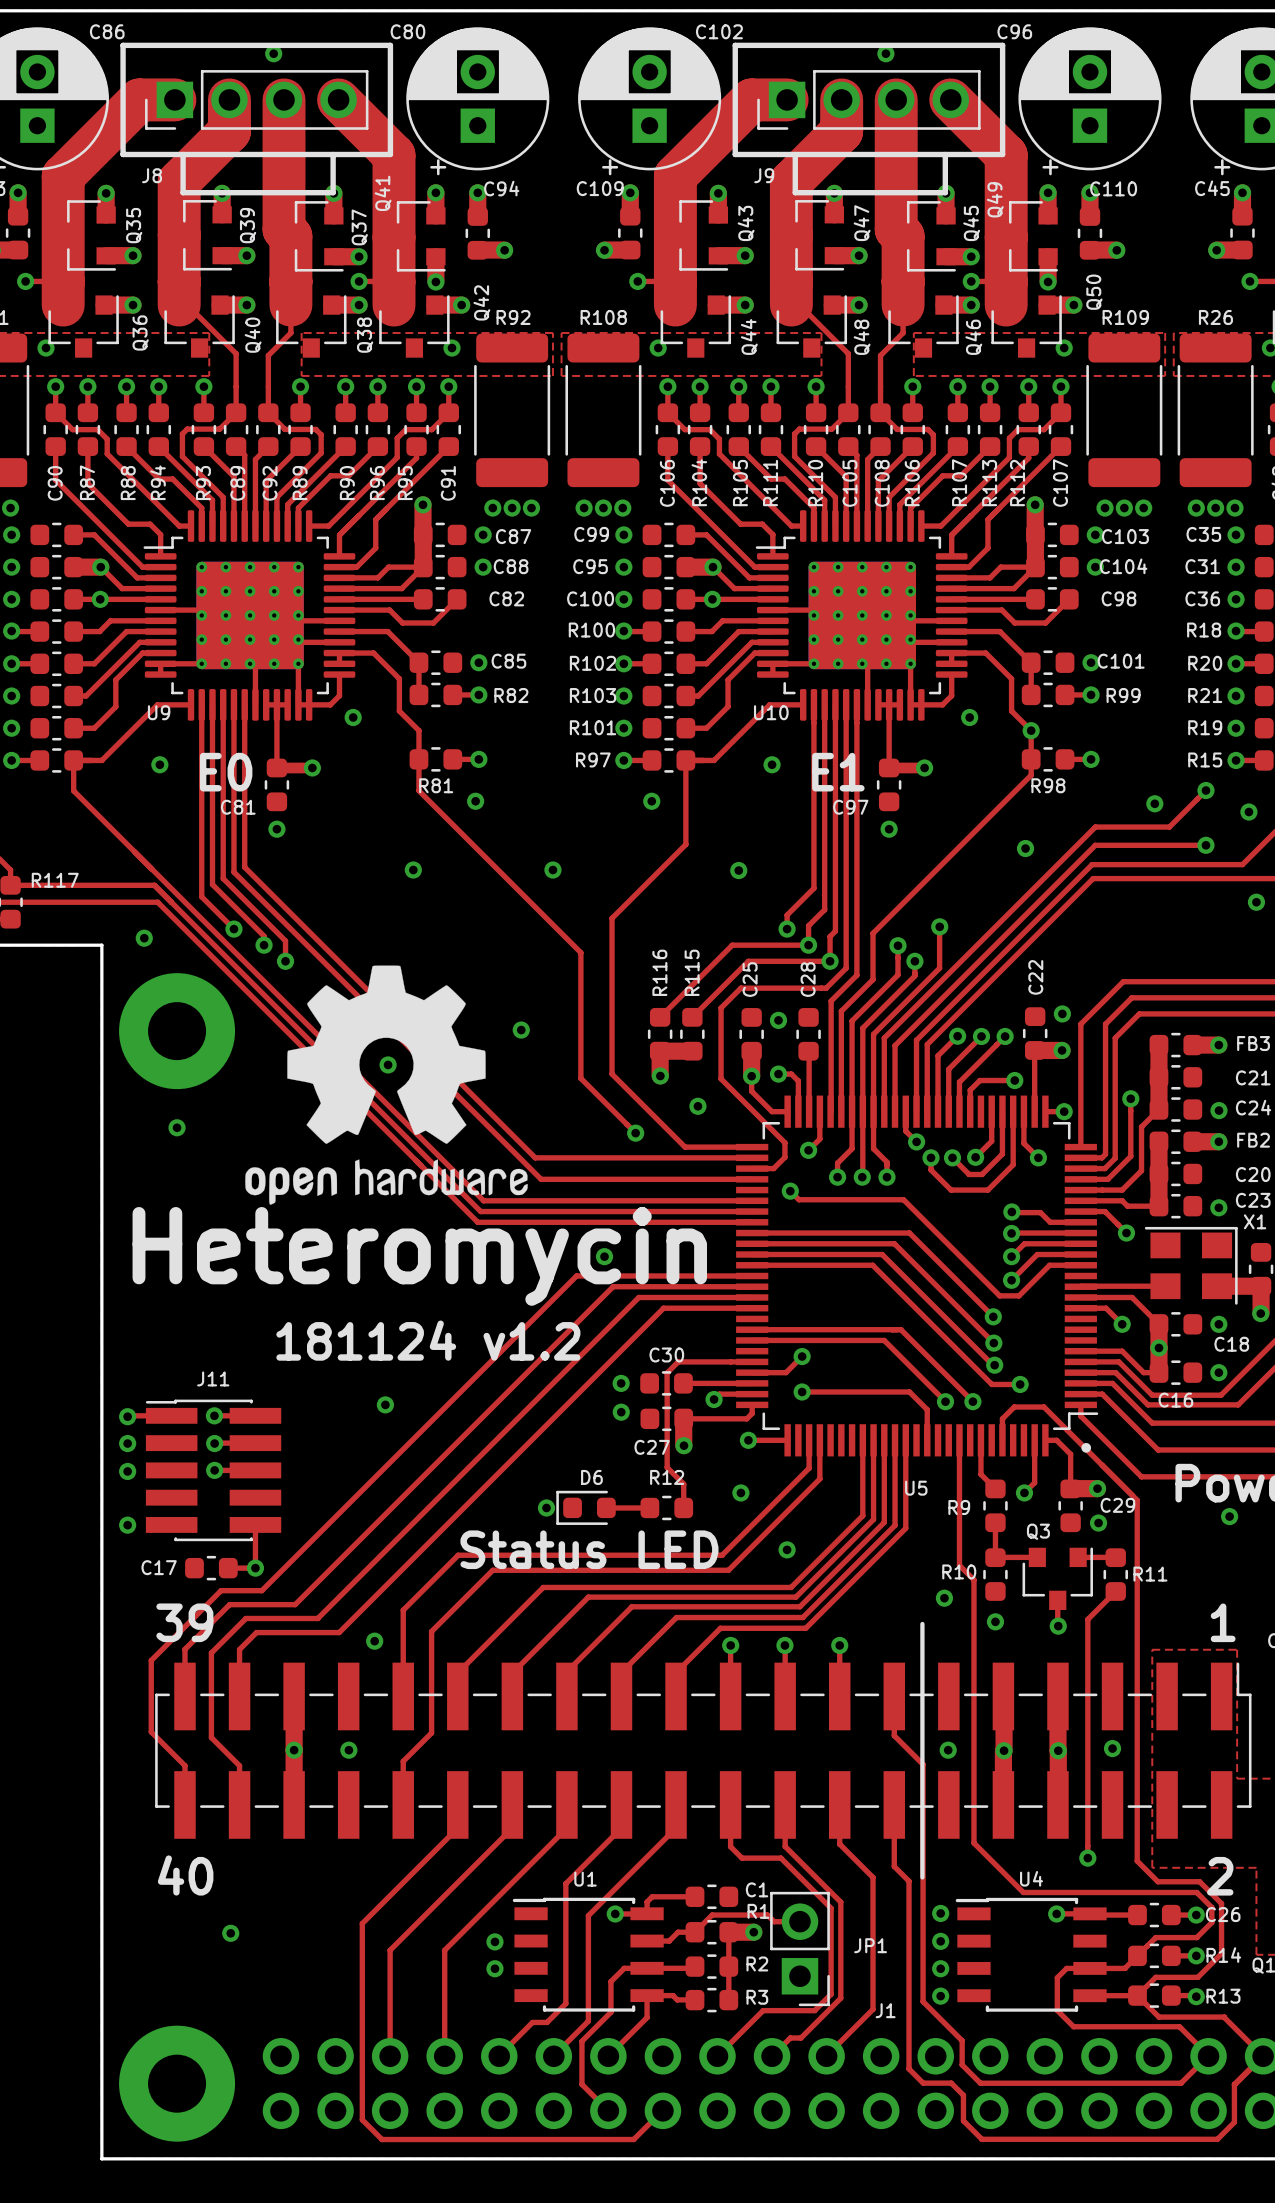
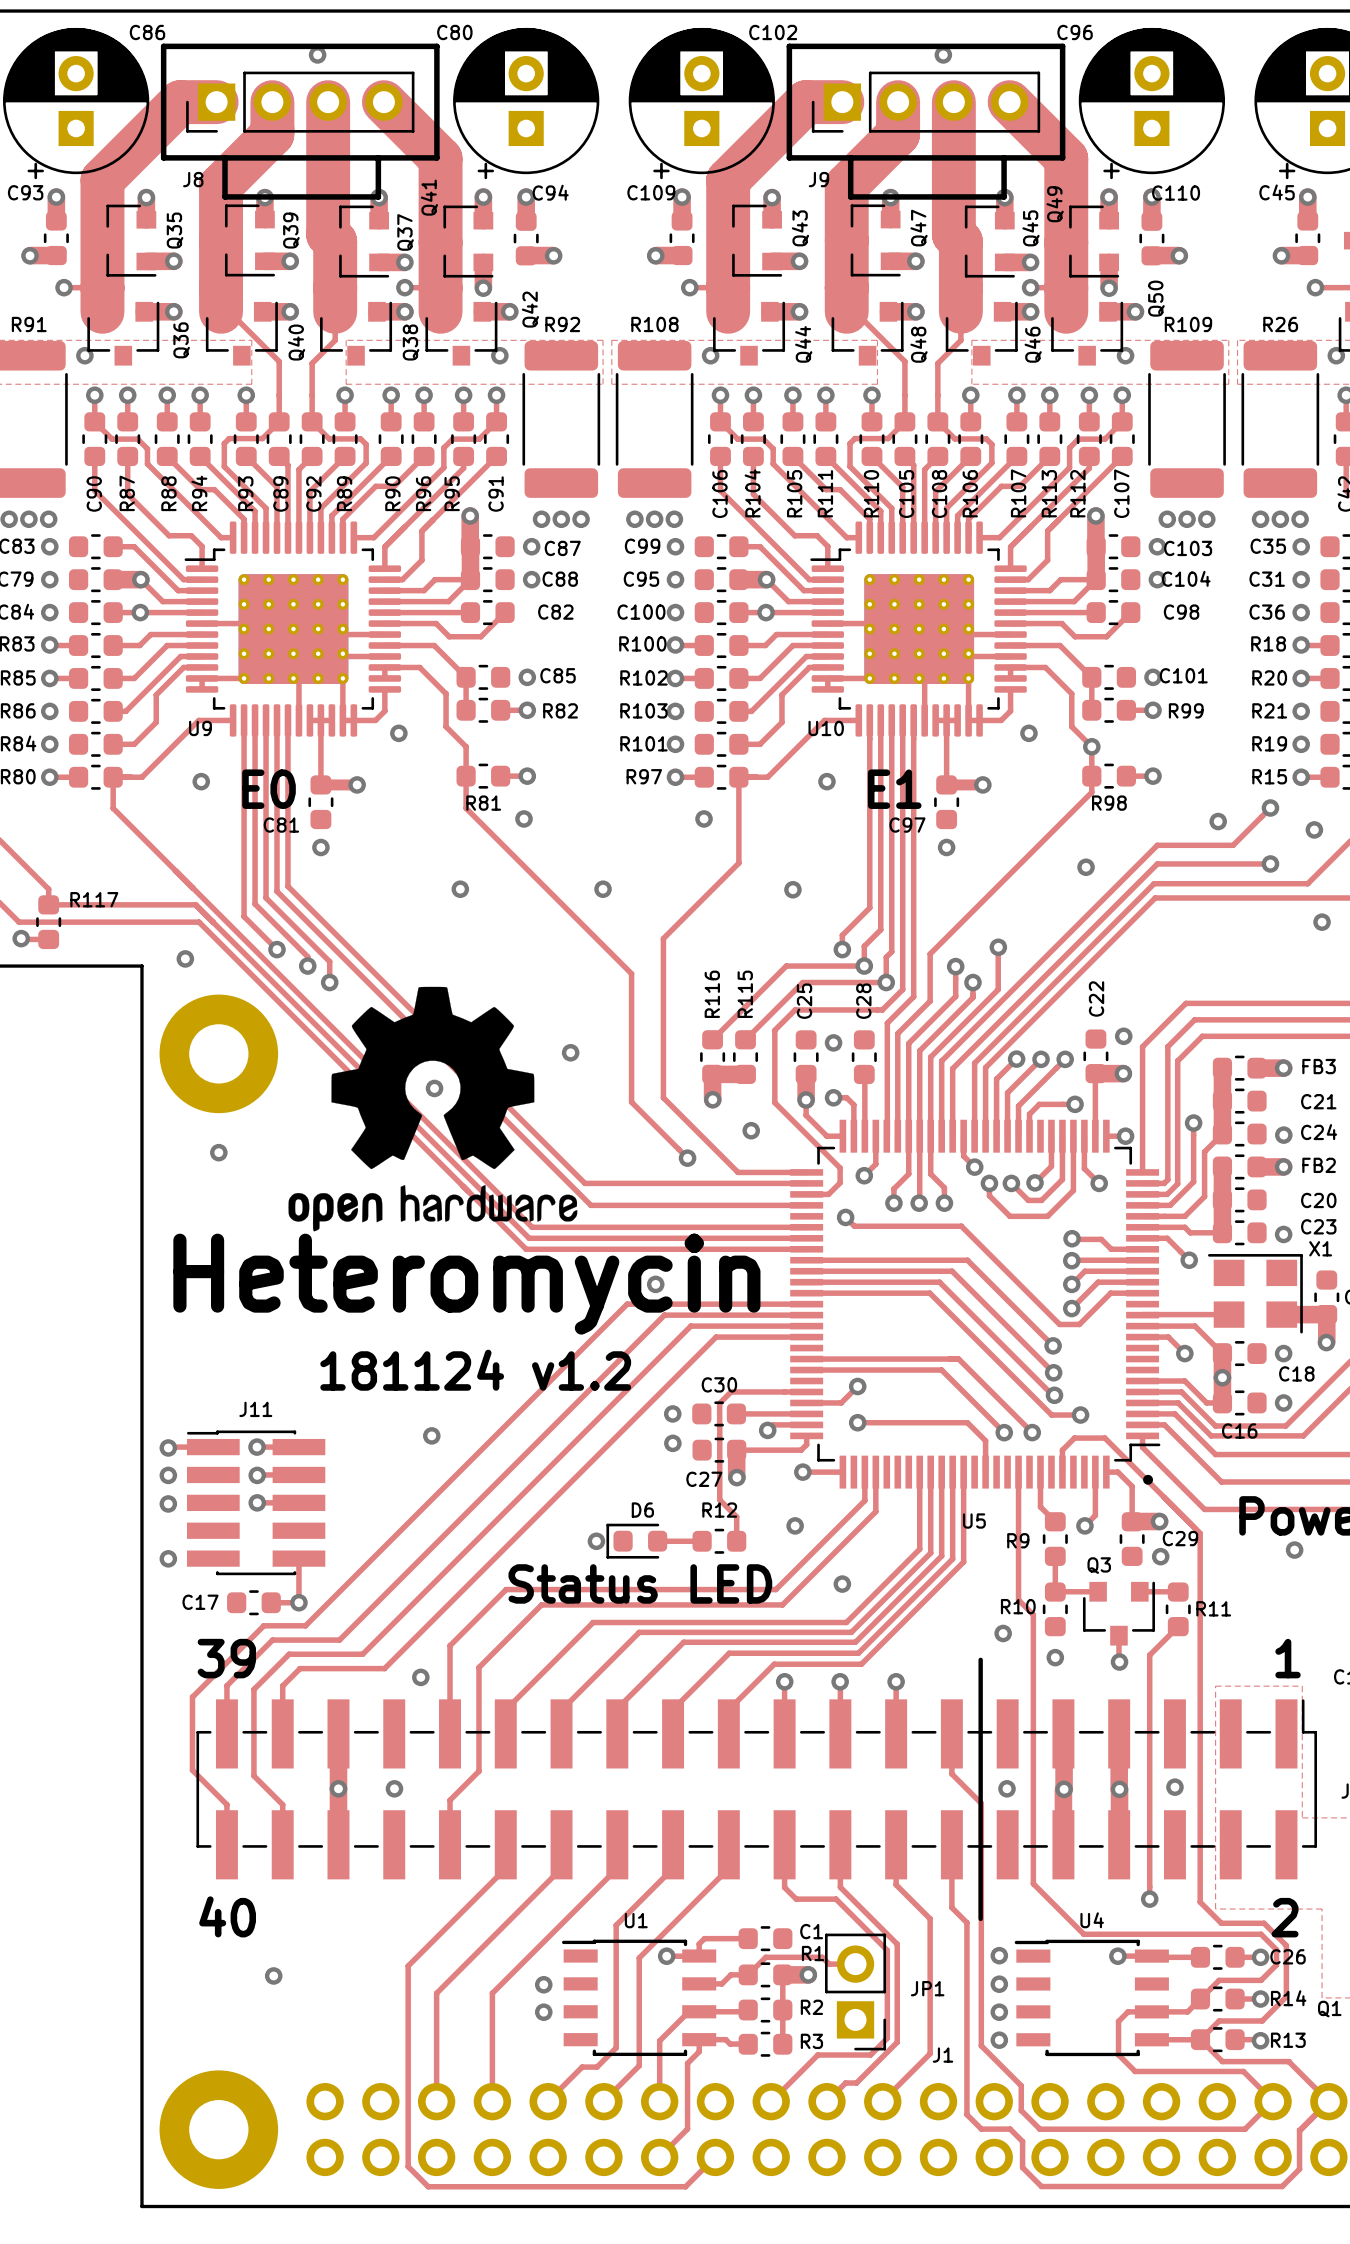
top track: (636, 1968) (624, 1968) (610, 1981) (610, 2012) (581, 2041) (581, 2084) (608, 2110) -> (699, 2051) (687, 2063) (687, 2129) (659, 2156)
top track: (647, 2007) (647, 2017) (608, 2056) -> (688, 2011) (659, 2040) (659, 2101)

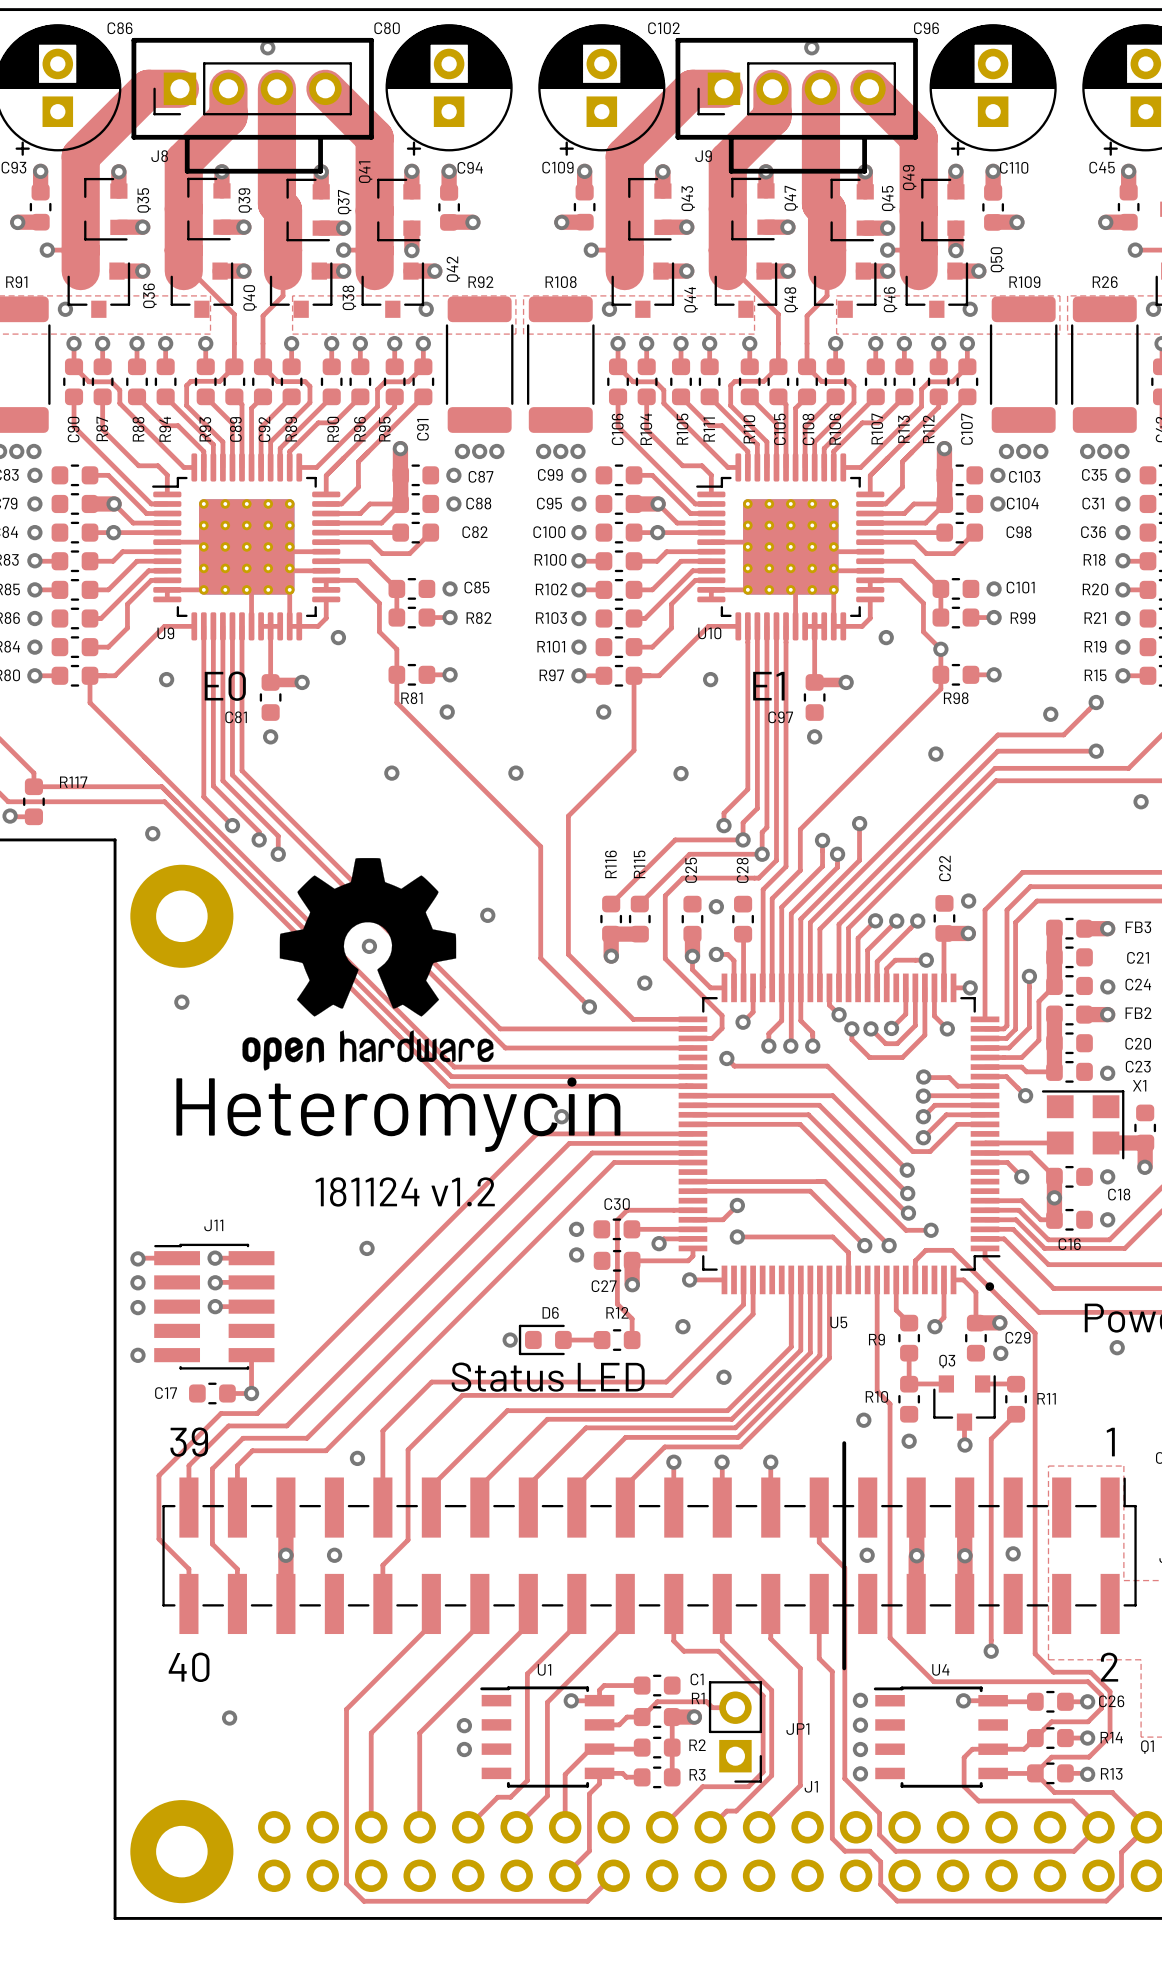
via: (1314, 829) -> none

